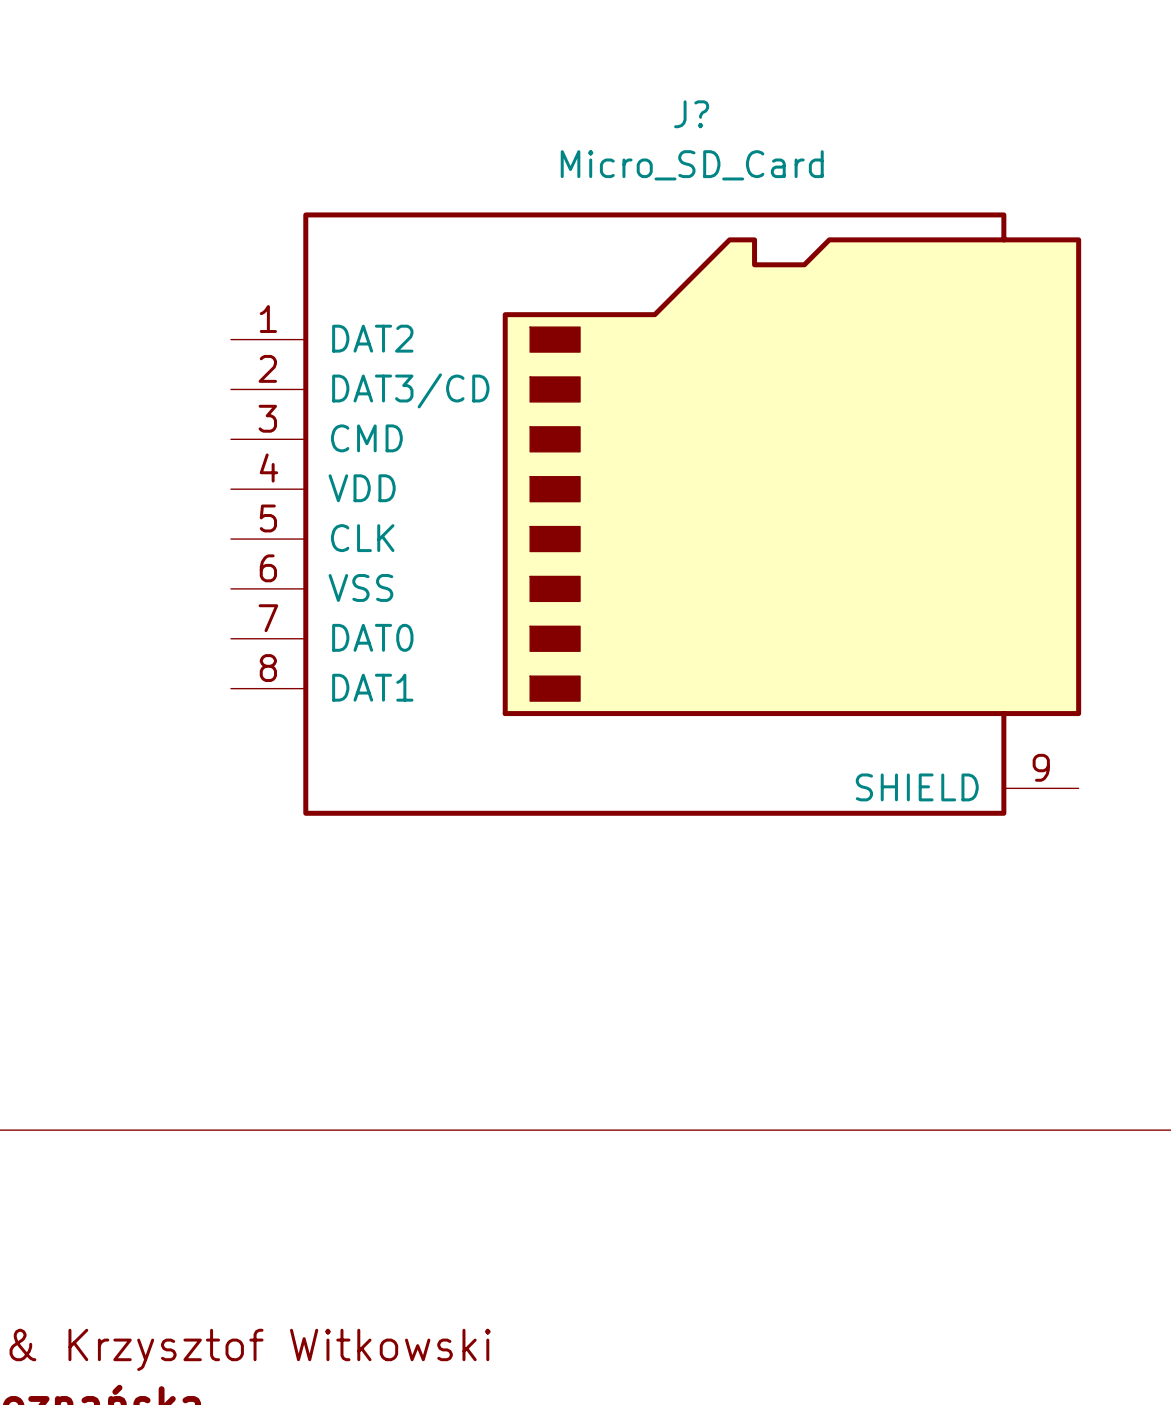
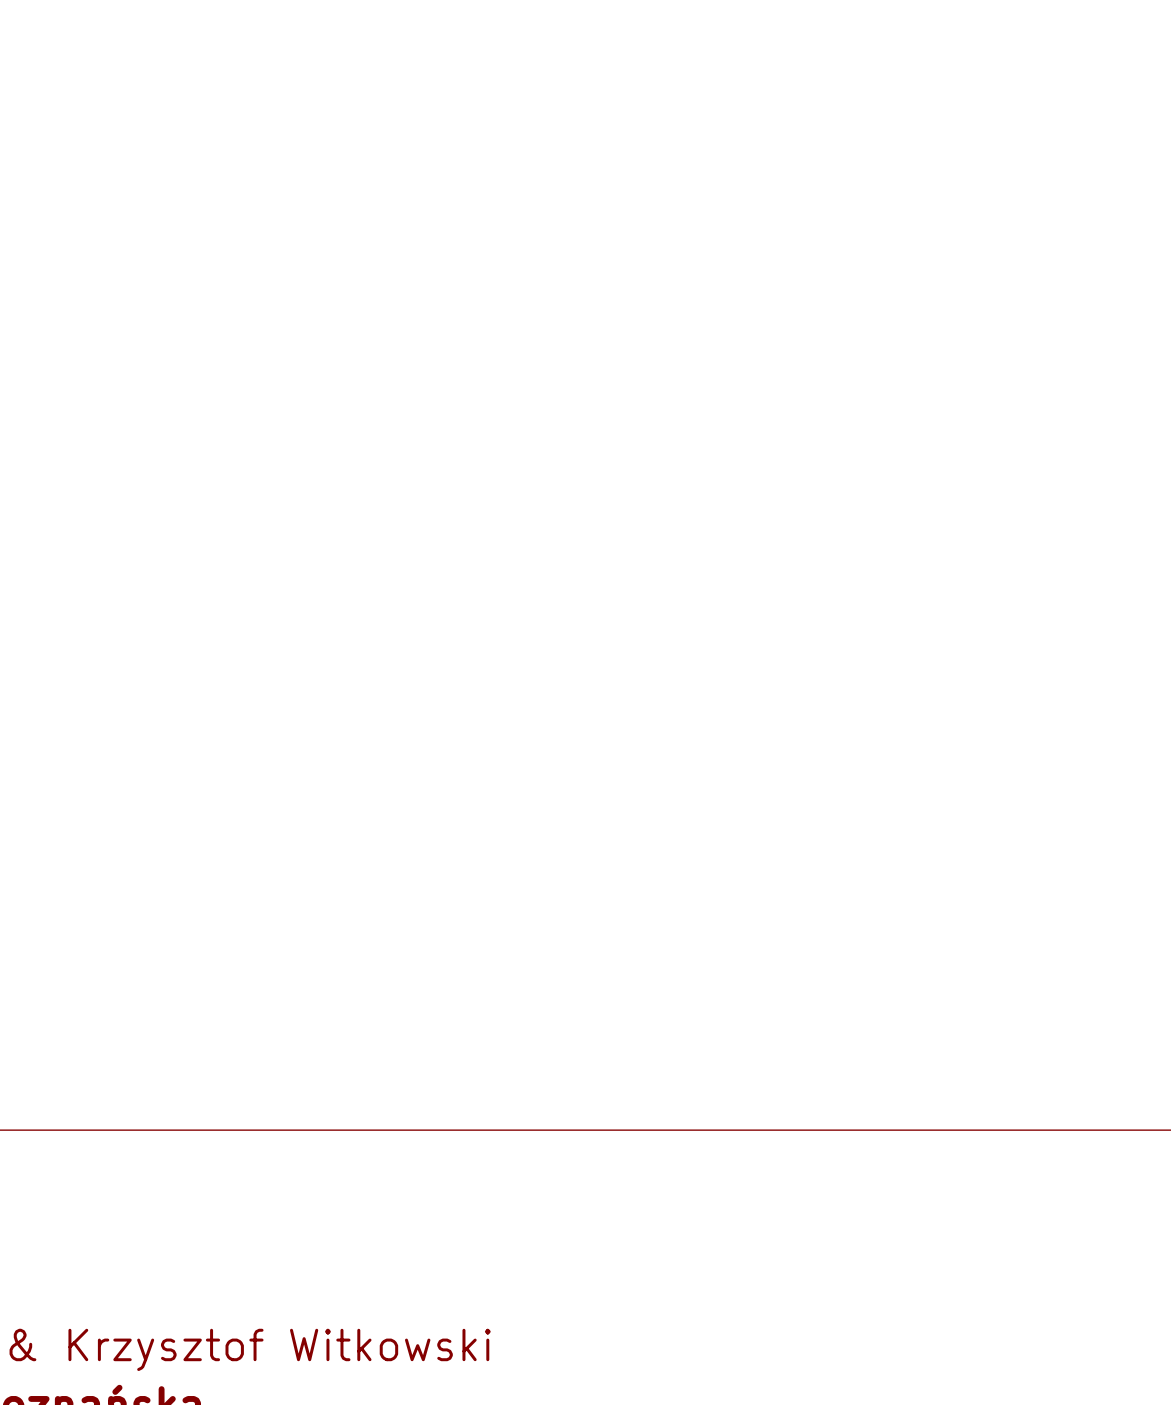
J?: Micro_SD_Card (656, 514) -> none

